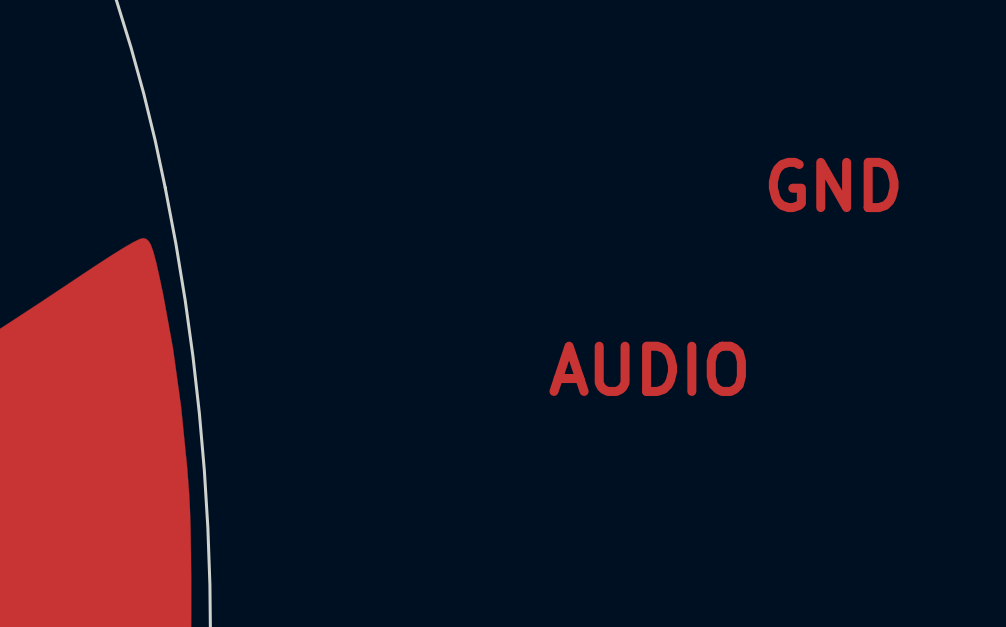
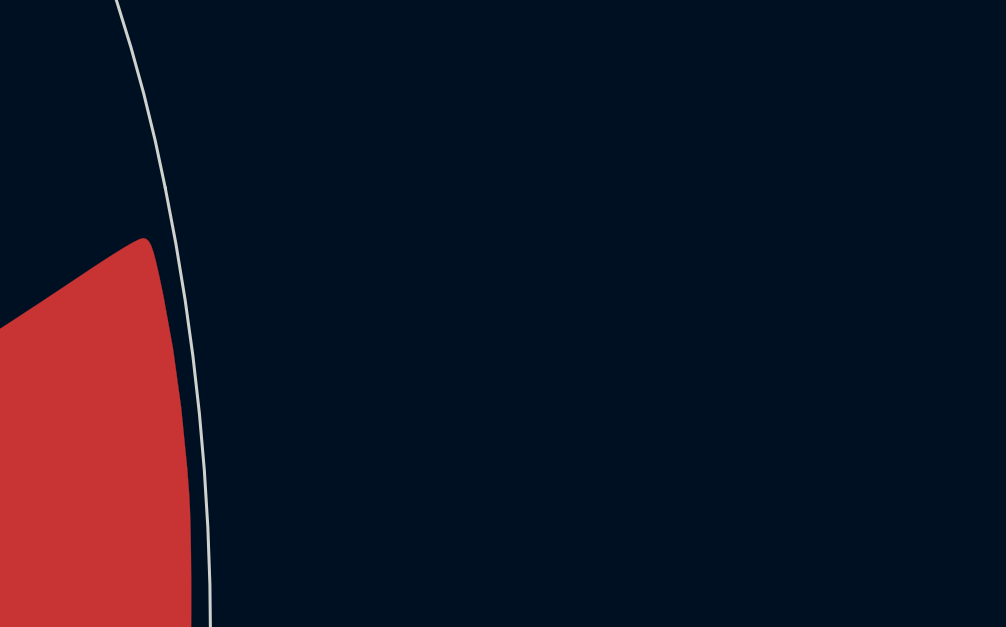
text: GND (833, 184) -> none
text: AUDIO (647, 368) -> none

